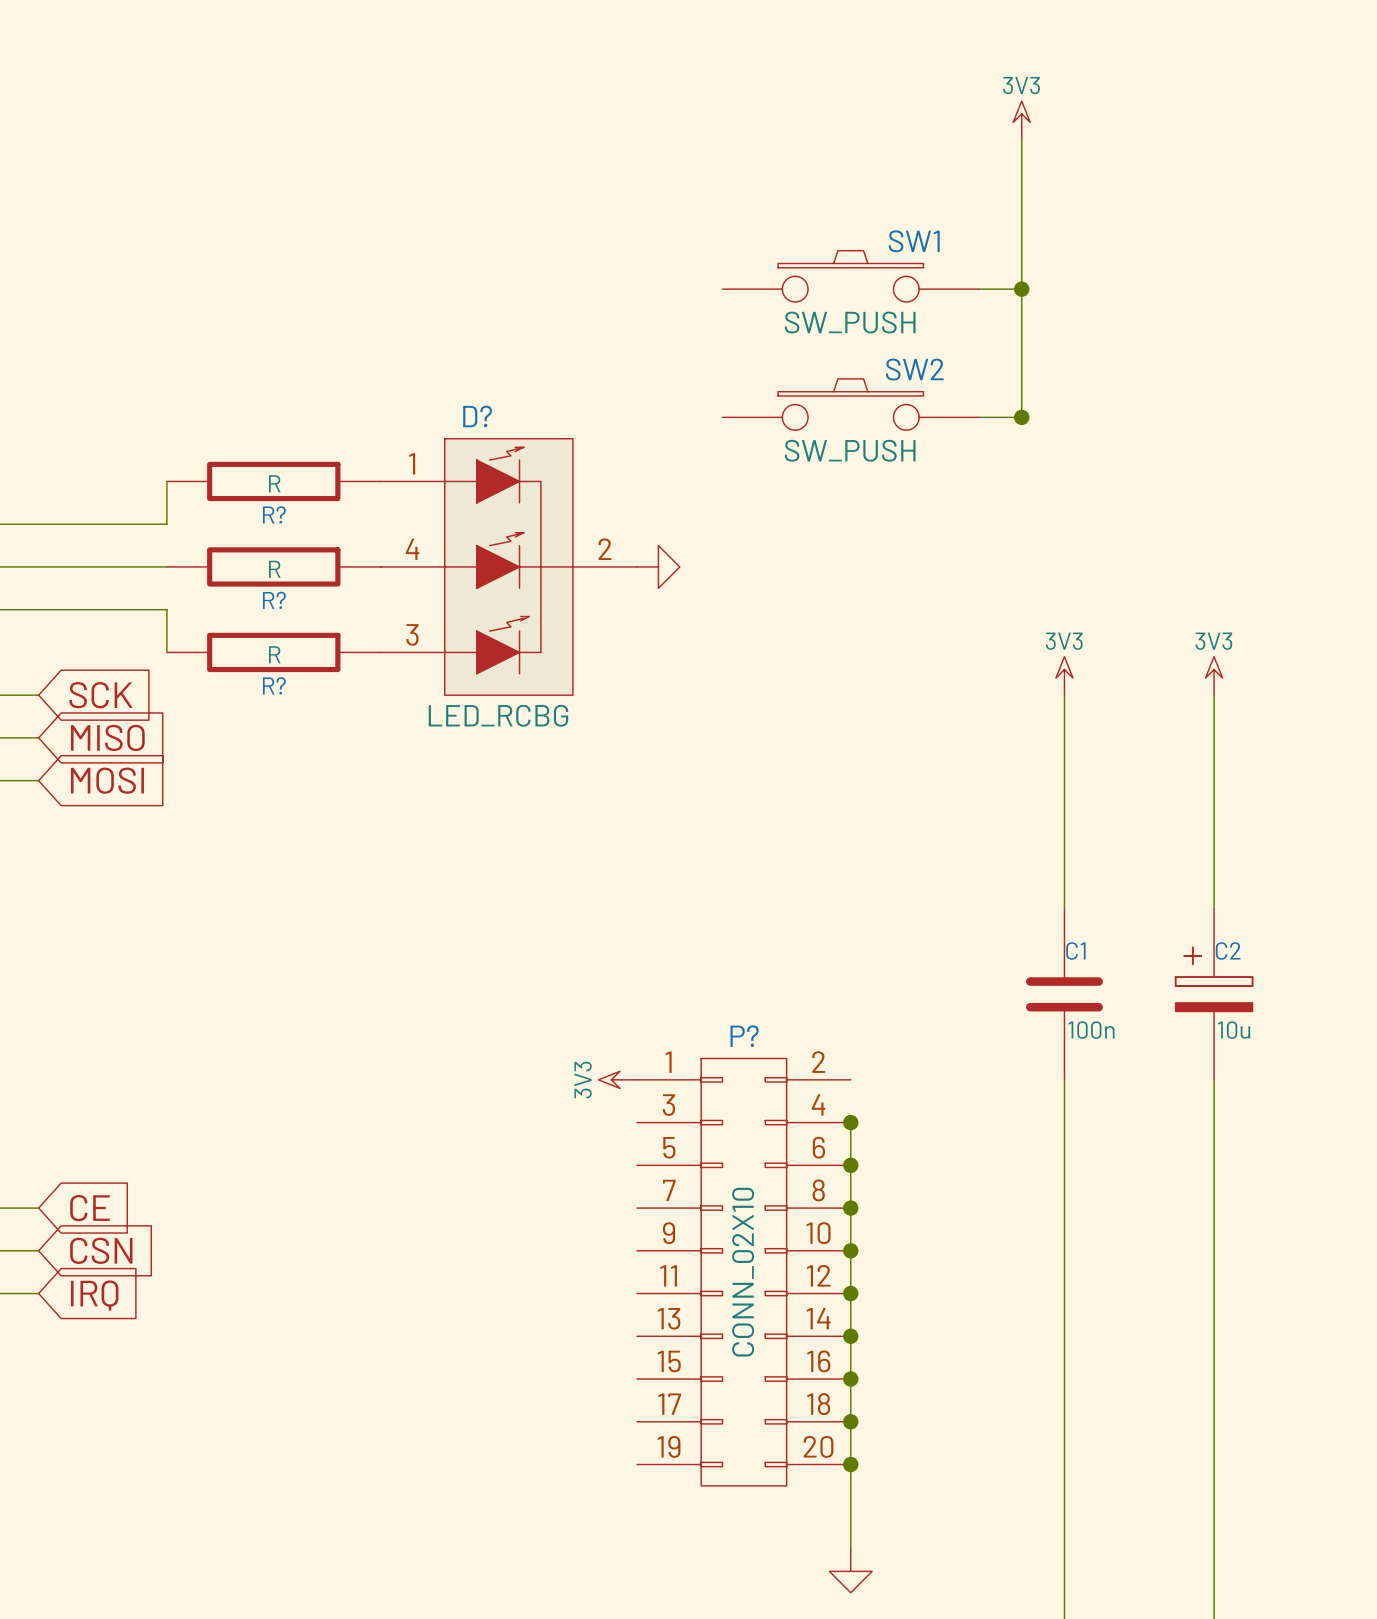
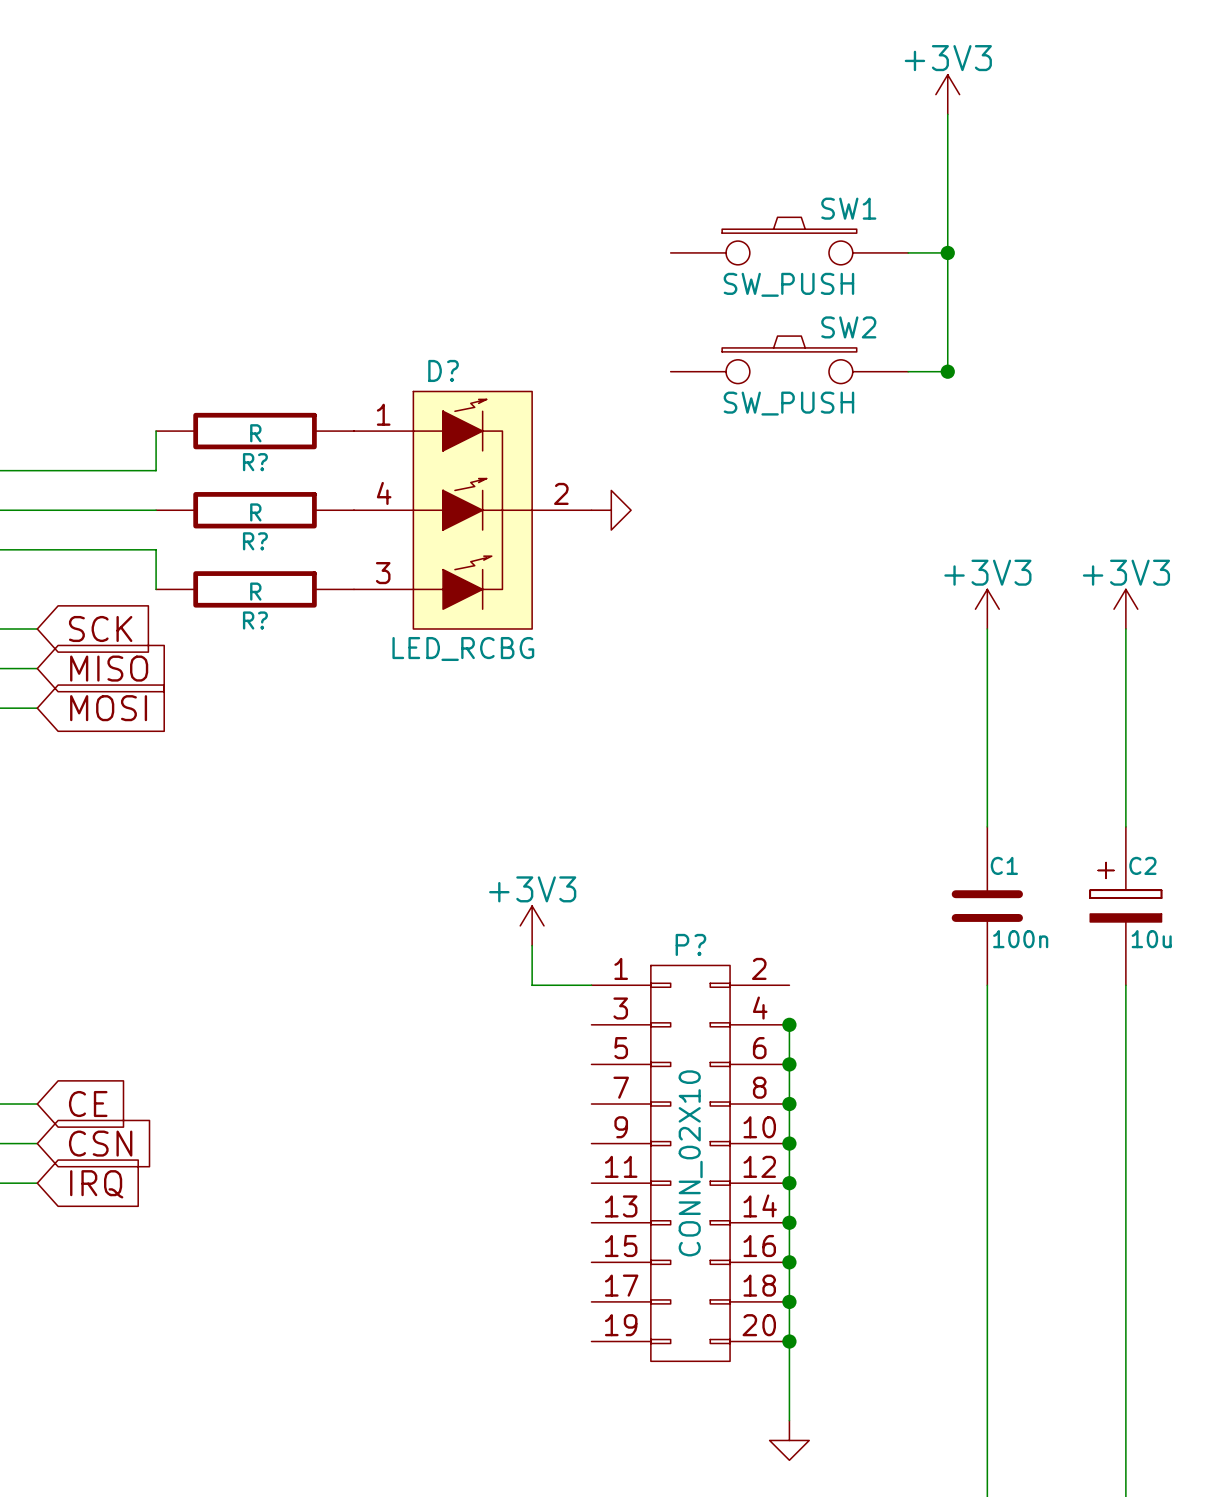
power symbol: 3V3 (1021, 120) -> +3V3 (947, 94)
power symbol: 3V3 (1064, 675) -> +3V3 (987, 609)
power symbol: 3V3 (1214, 675) -> +3V3 (1125, 609)
power symbol: none -> +3V3 (532, 925)
wire: none -> (532, 945) (532, 985) (591, 985)
power symbol: 3V3 (617, 1079) -> none

